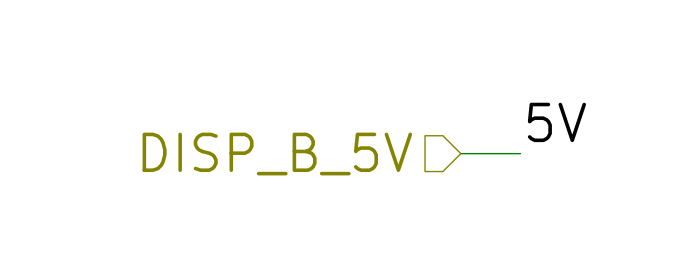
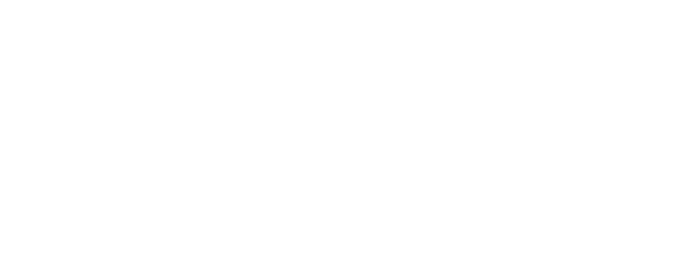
label: 5V (556, 122) -> none
wire: (460, 153) (520, 153) -> none
hierarchical label: DISP_B_5V (277, 154) -> none

